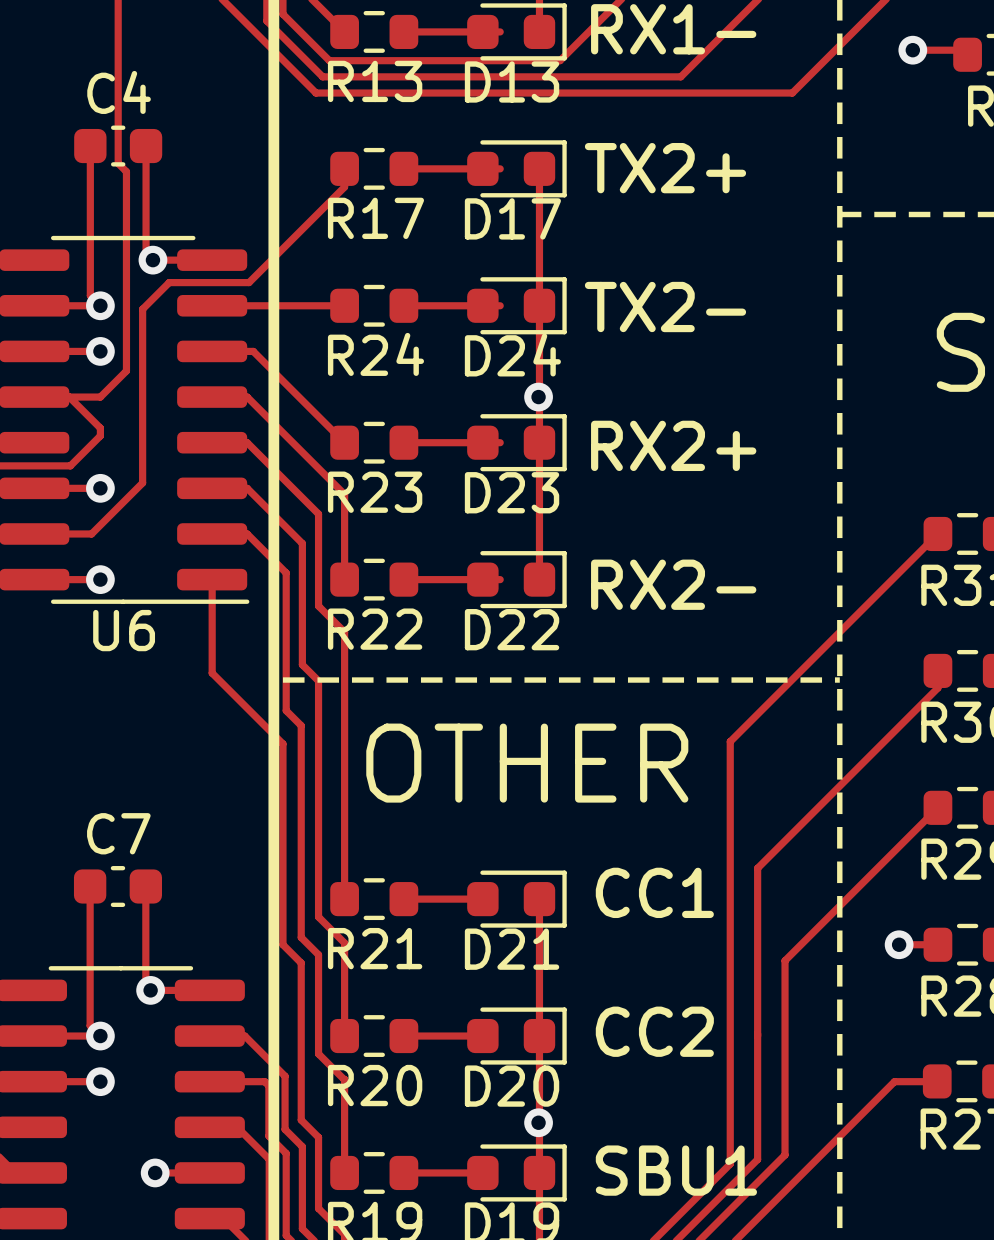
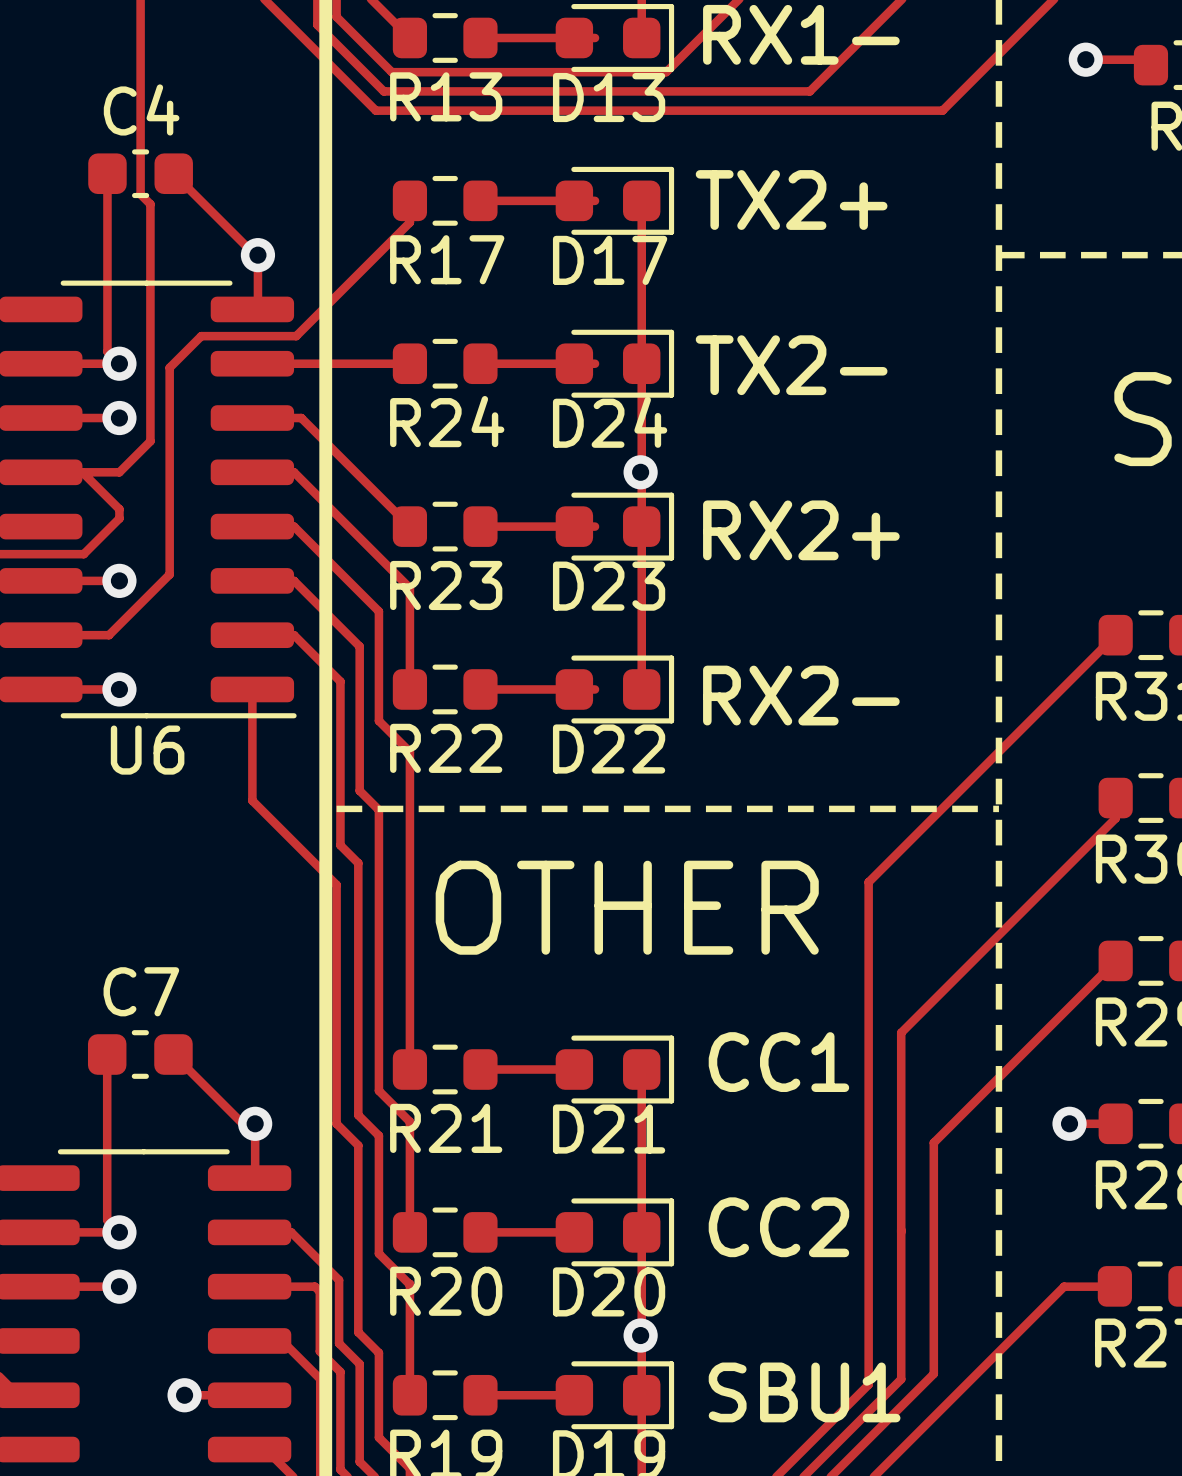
track: (146, 146) (146, 253) (152, 260) (212, 260) -> (173, 173) (255, 255) (257, 255) (257, 303)
via position: (152, 260) -> (257, 255)
track: (145, 886) (145, 985) (150, 990) (209, 990) -> (173, 1054) (242, 1123) (255, 1123) (255, 1172)
via position: (150, 990) -> (255, 1123)

